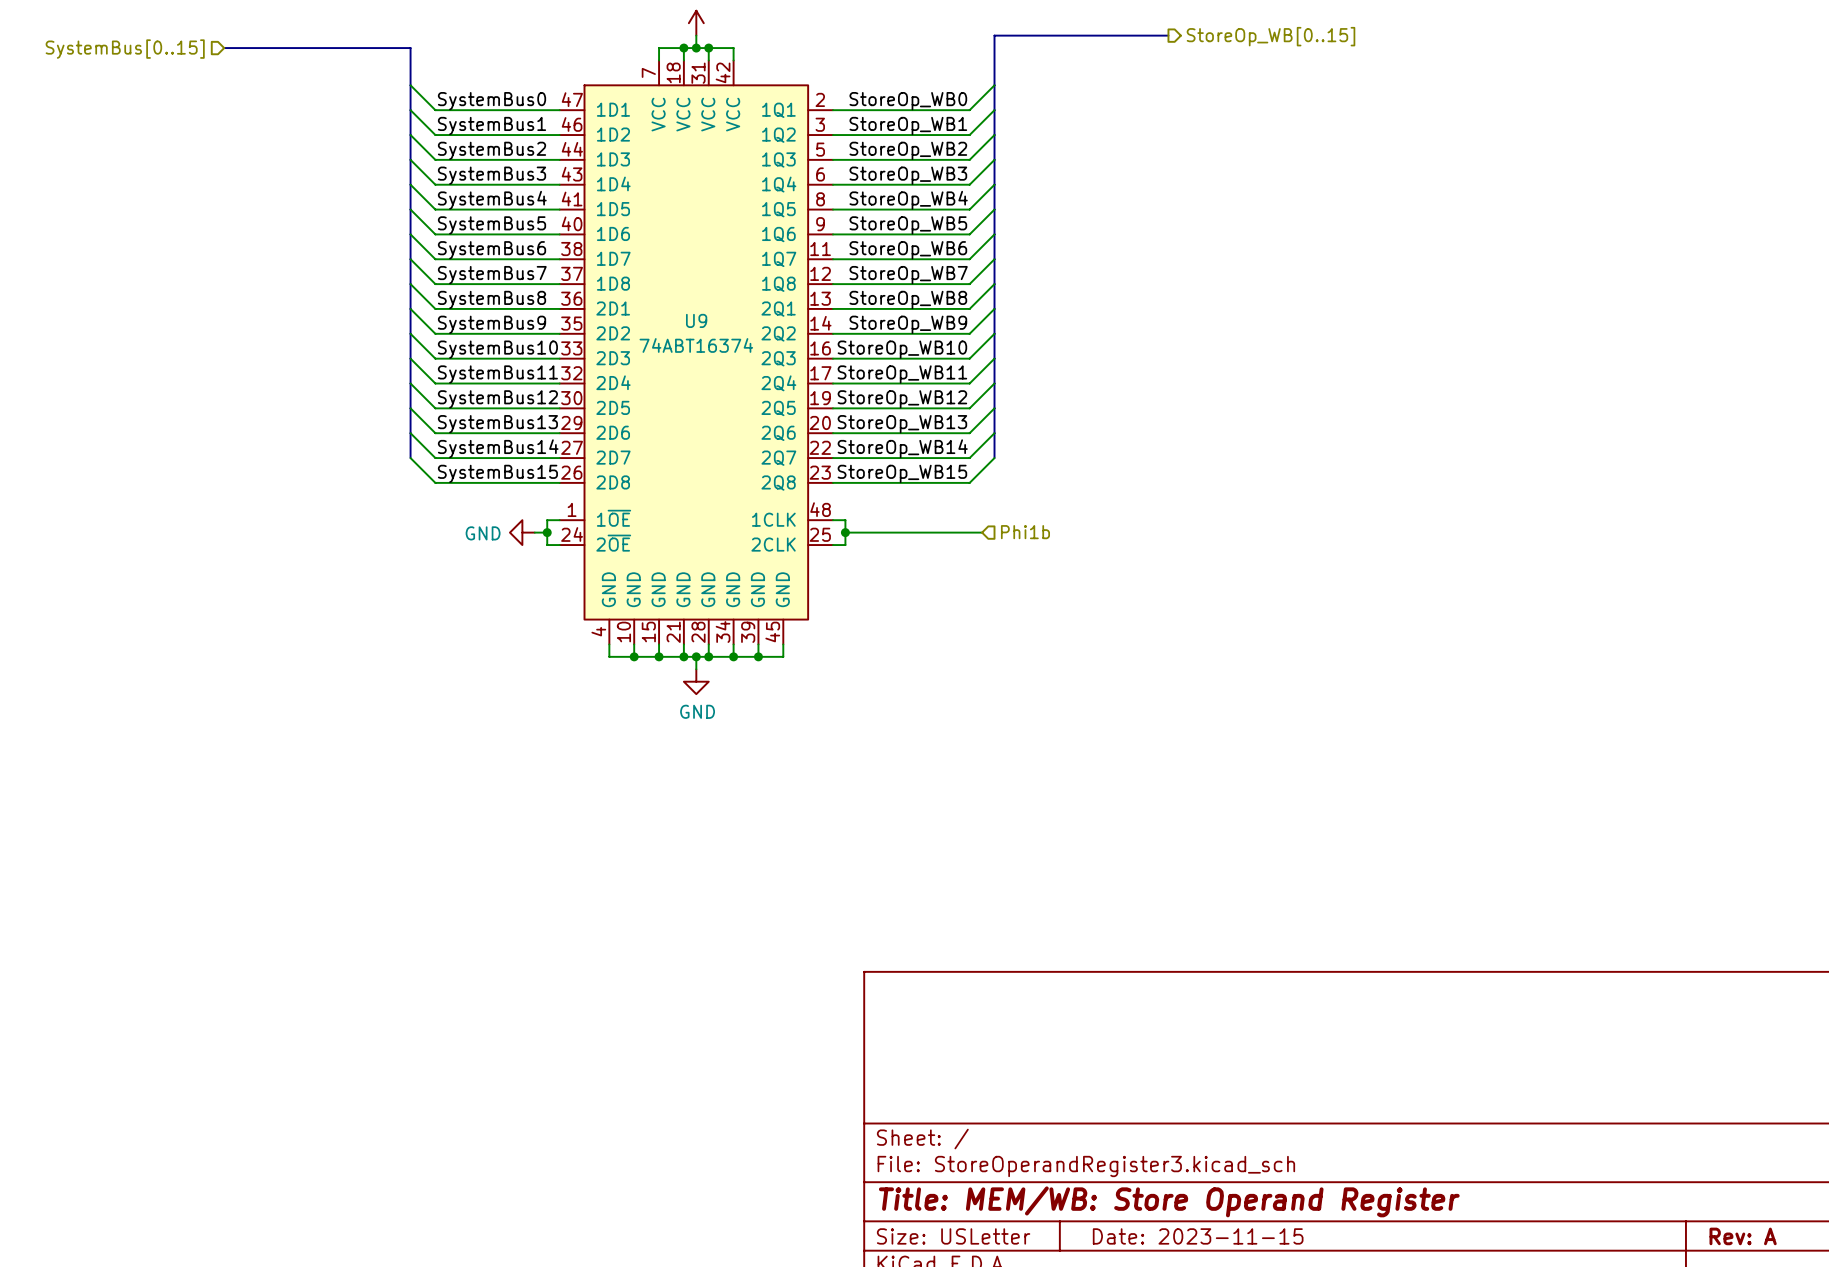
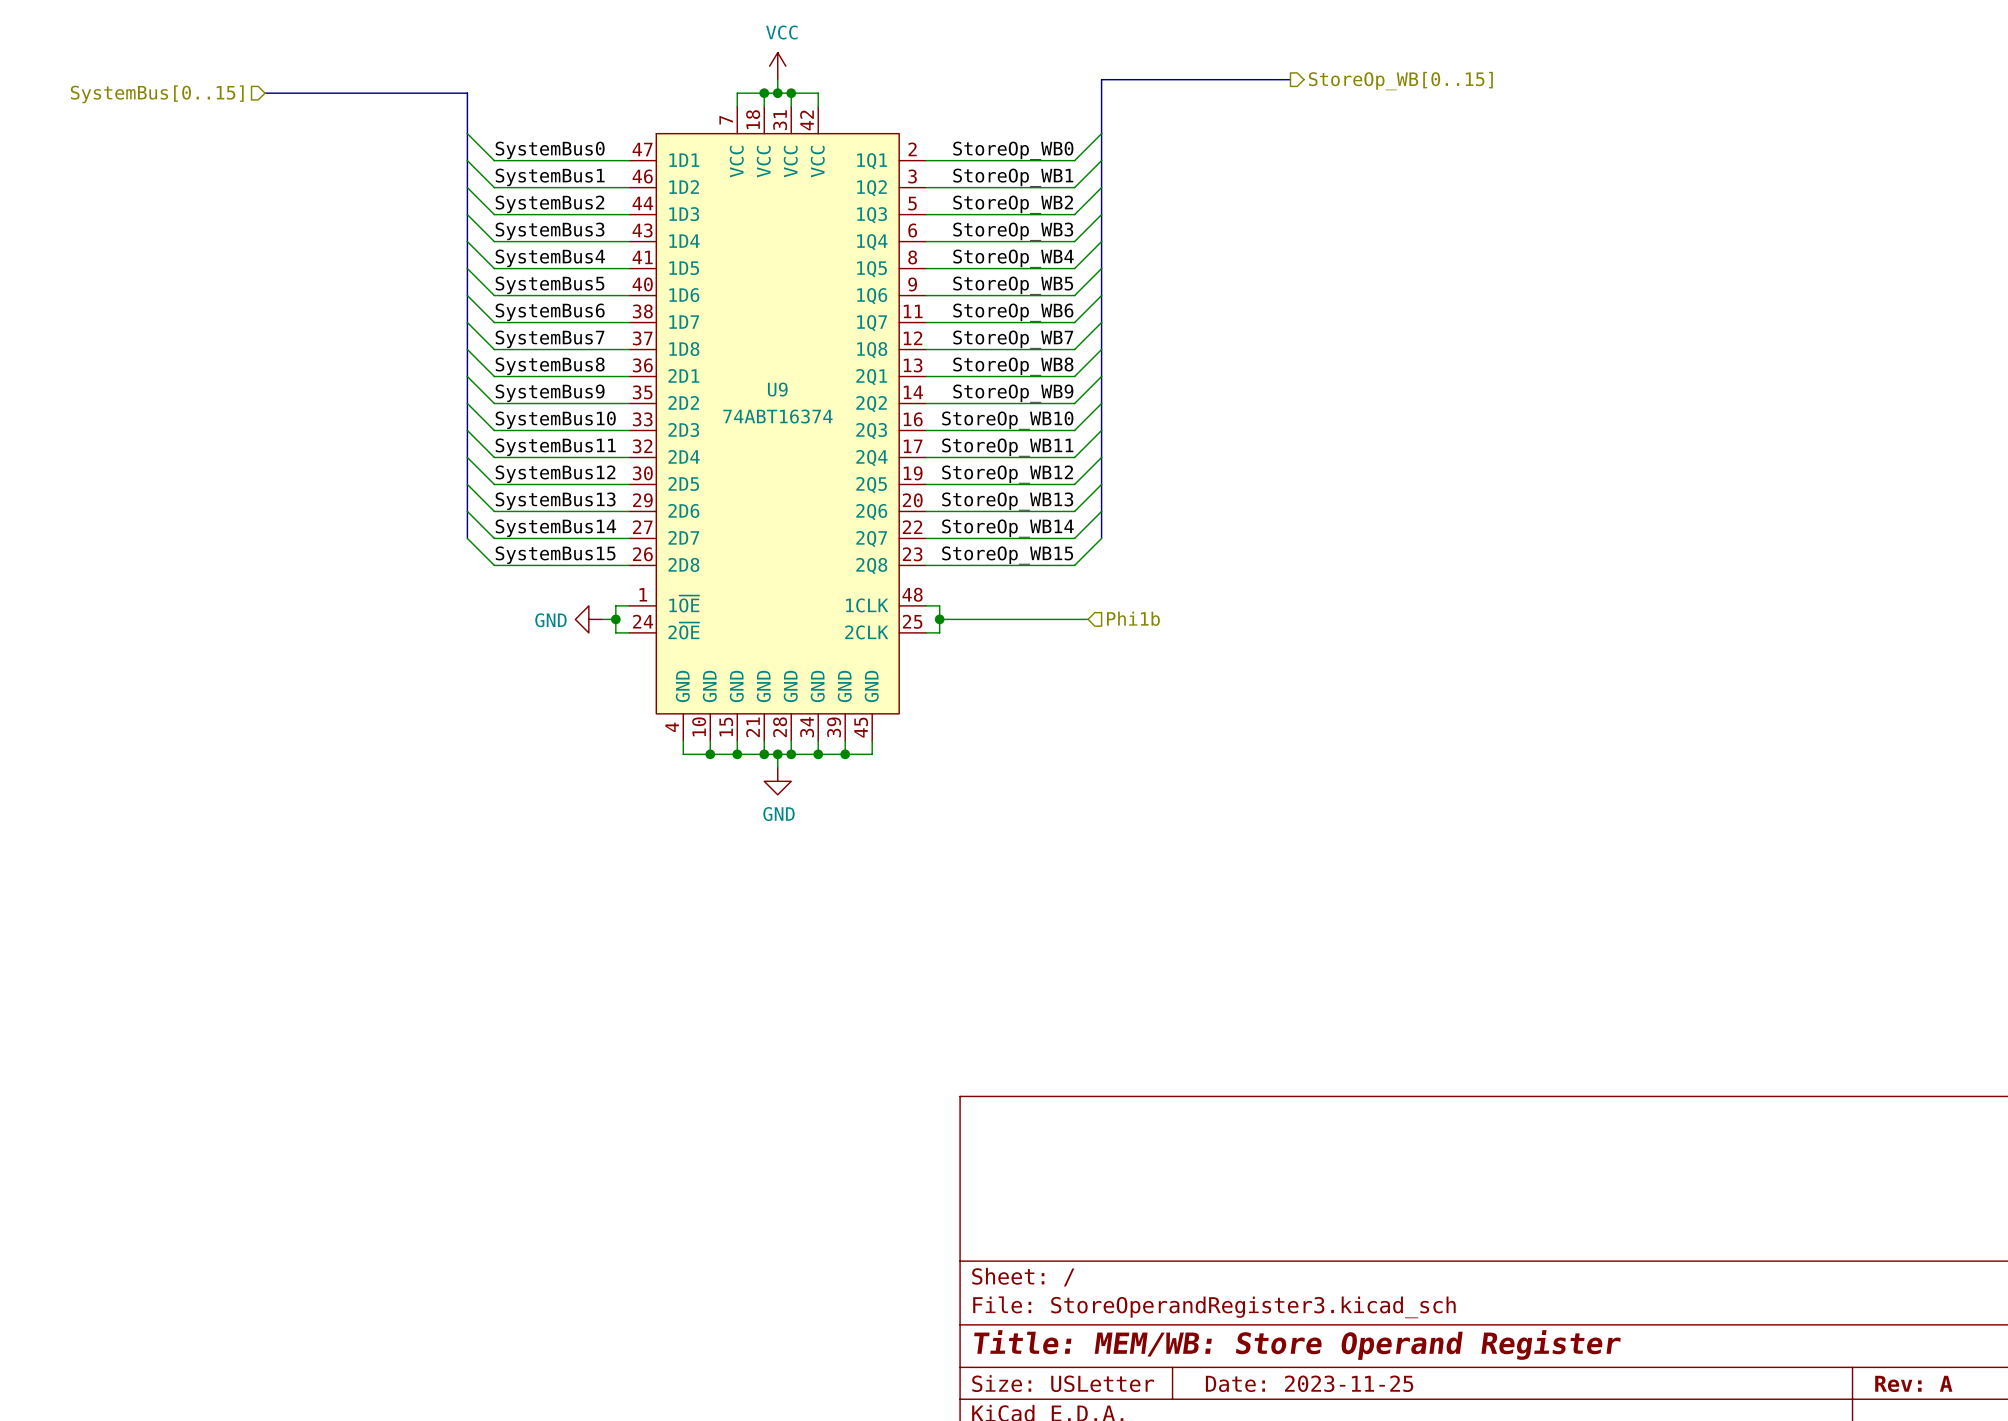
title block: Date: 2023-11-15 (1198, 1236) -> Date: 2023-11-25 (1309, 1383)

